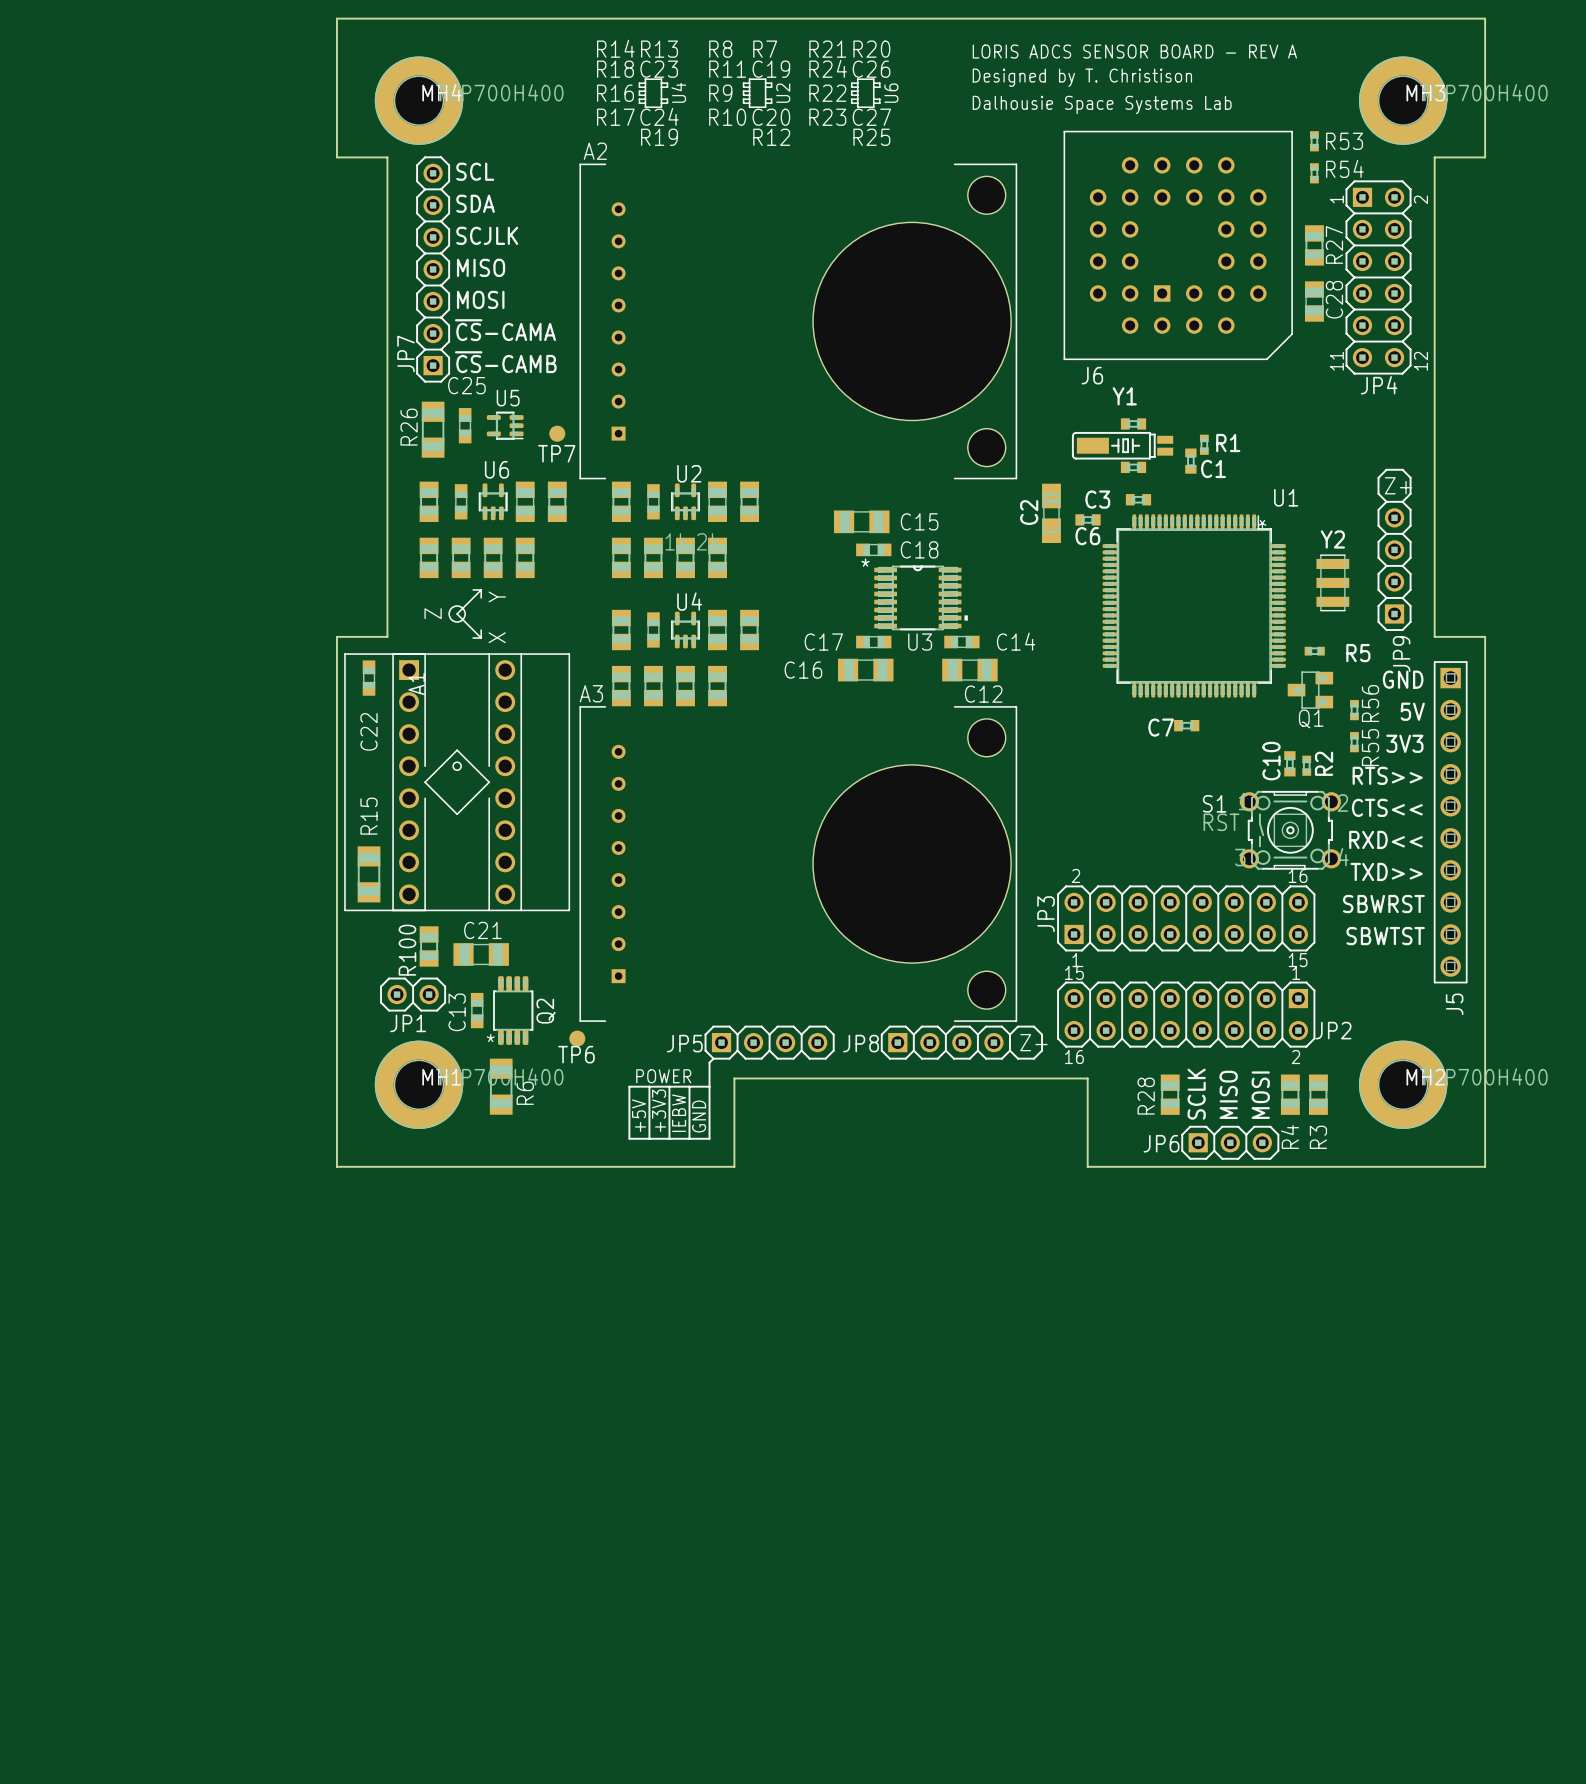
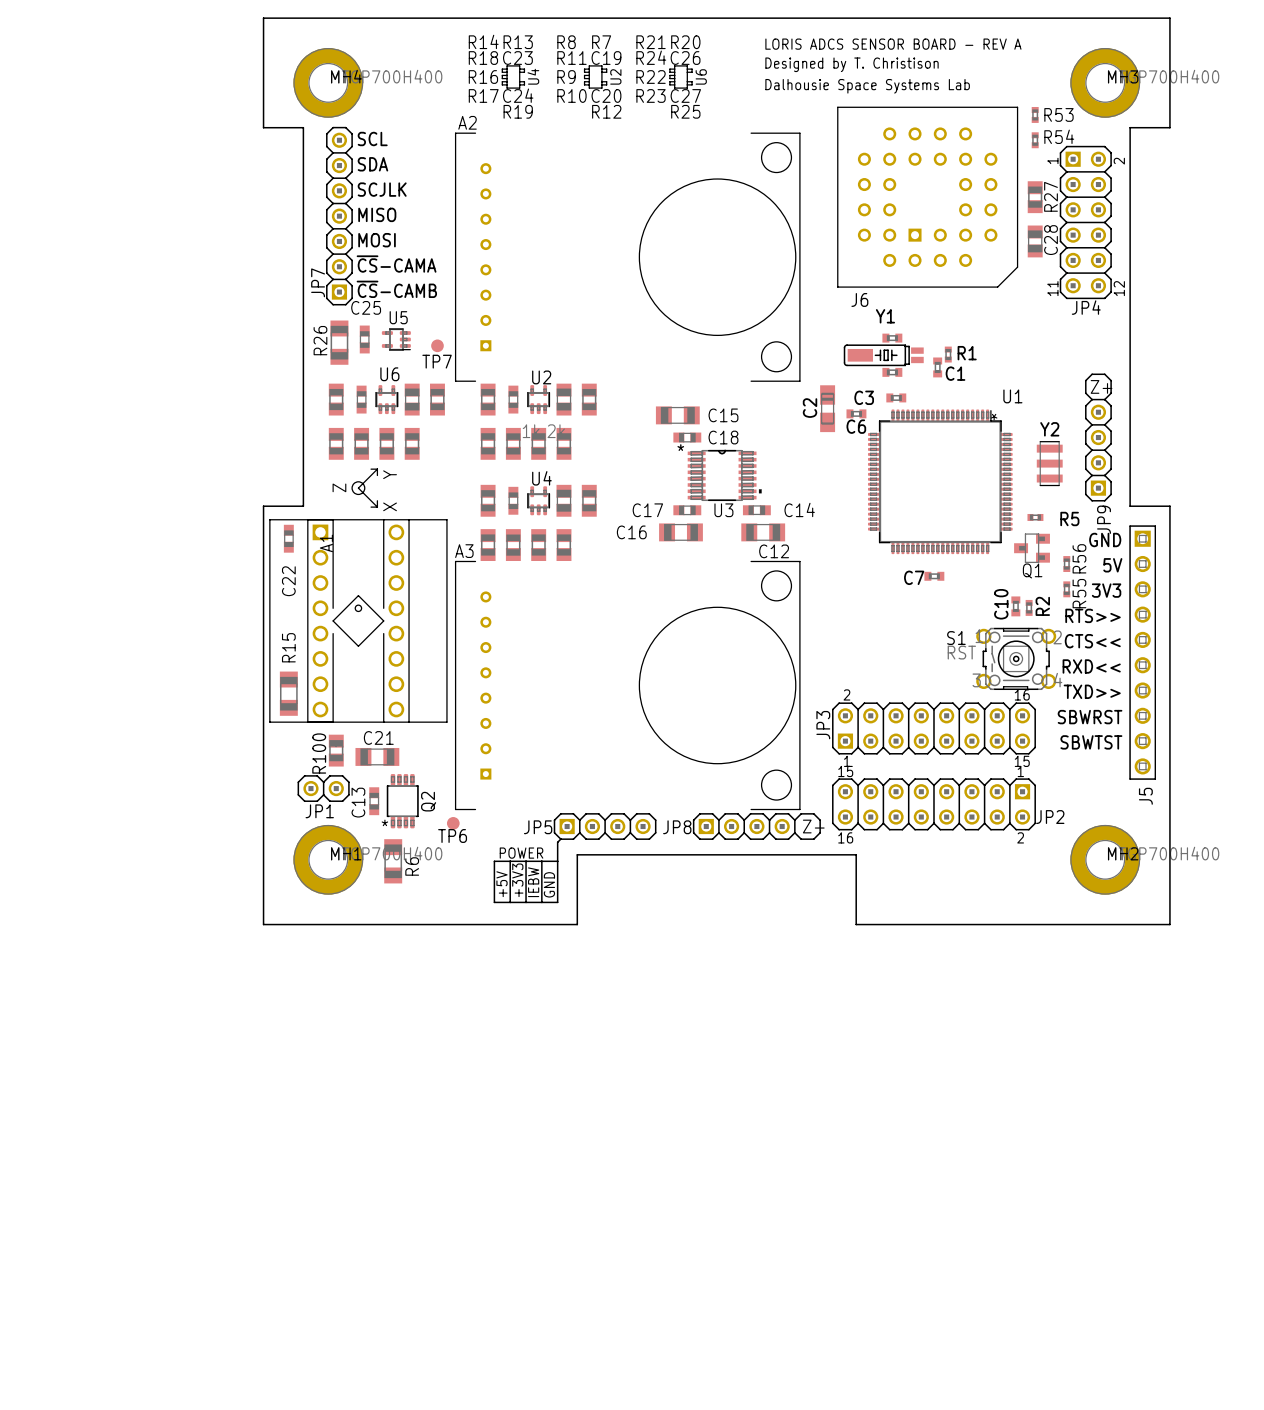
R28: (1170, 1094) -> none
text: SCLK (1196, 1094) -> none
text: MISO (1228, 1094) -> none
R4: (1290, 1094) -> none
R3: (1318, 1094) -> none
text: MOSI (1260, 1095) -> none
JP6: (1230, 1142) -> none

